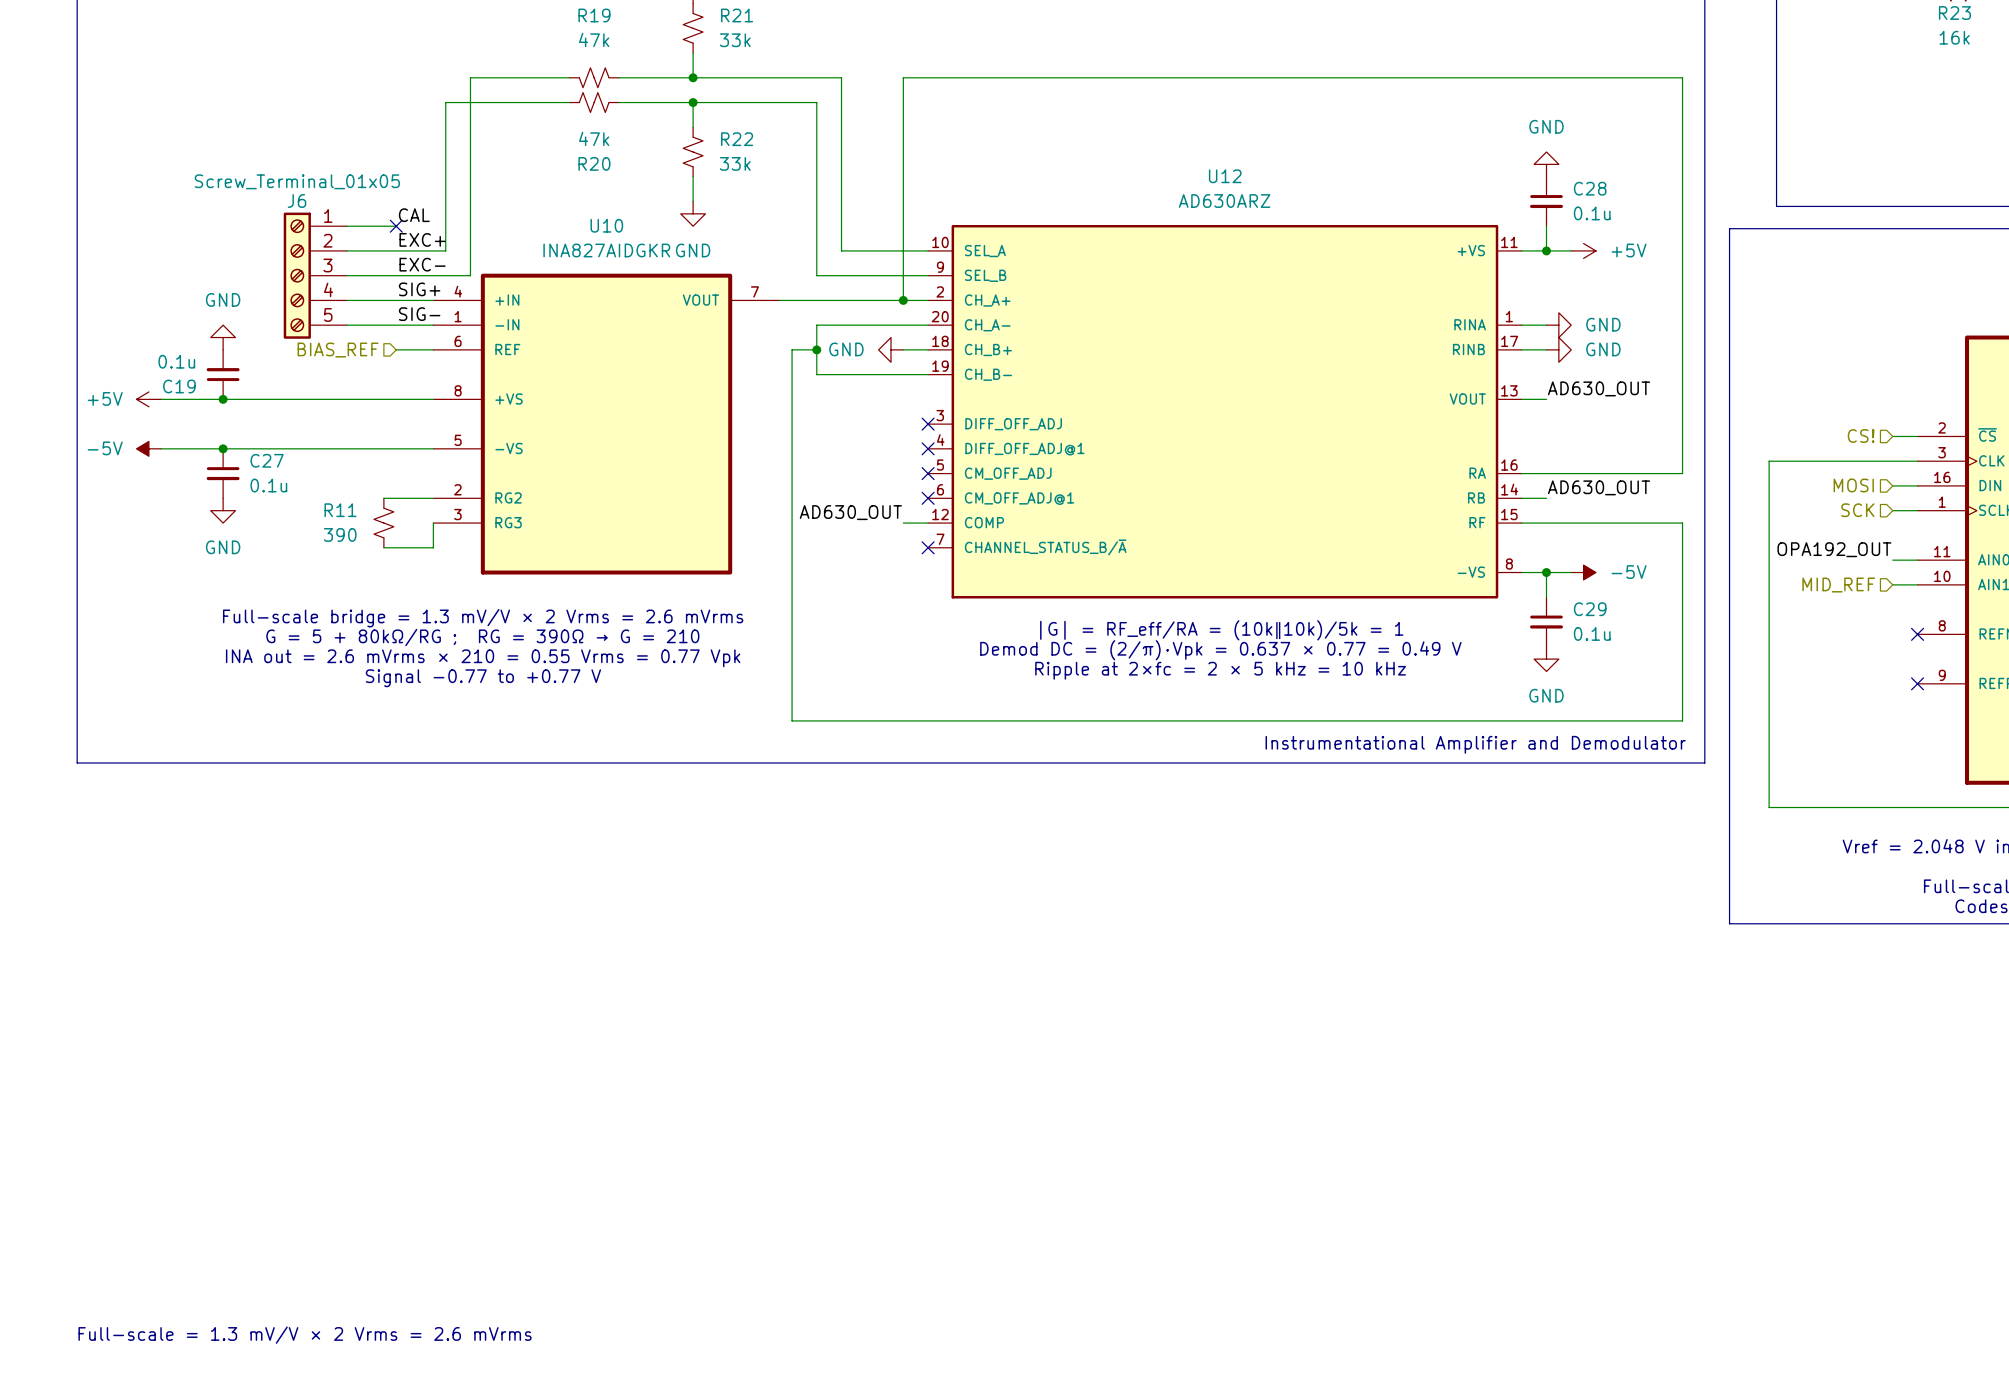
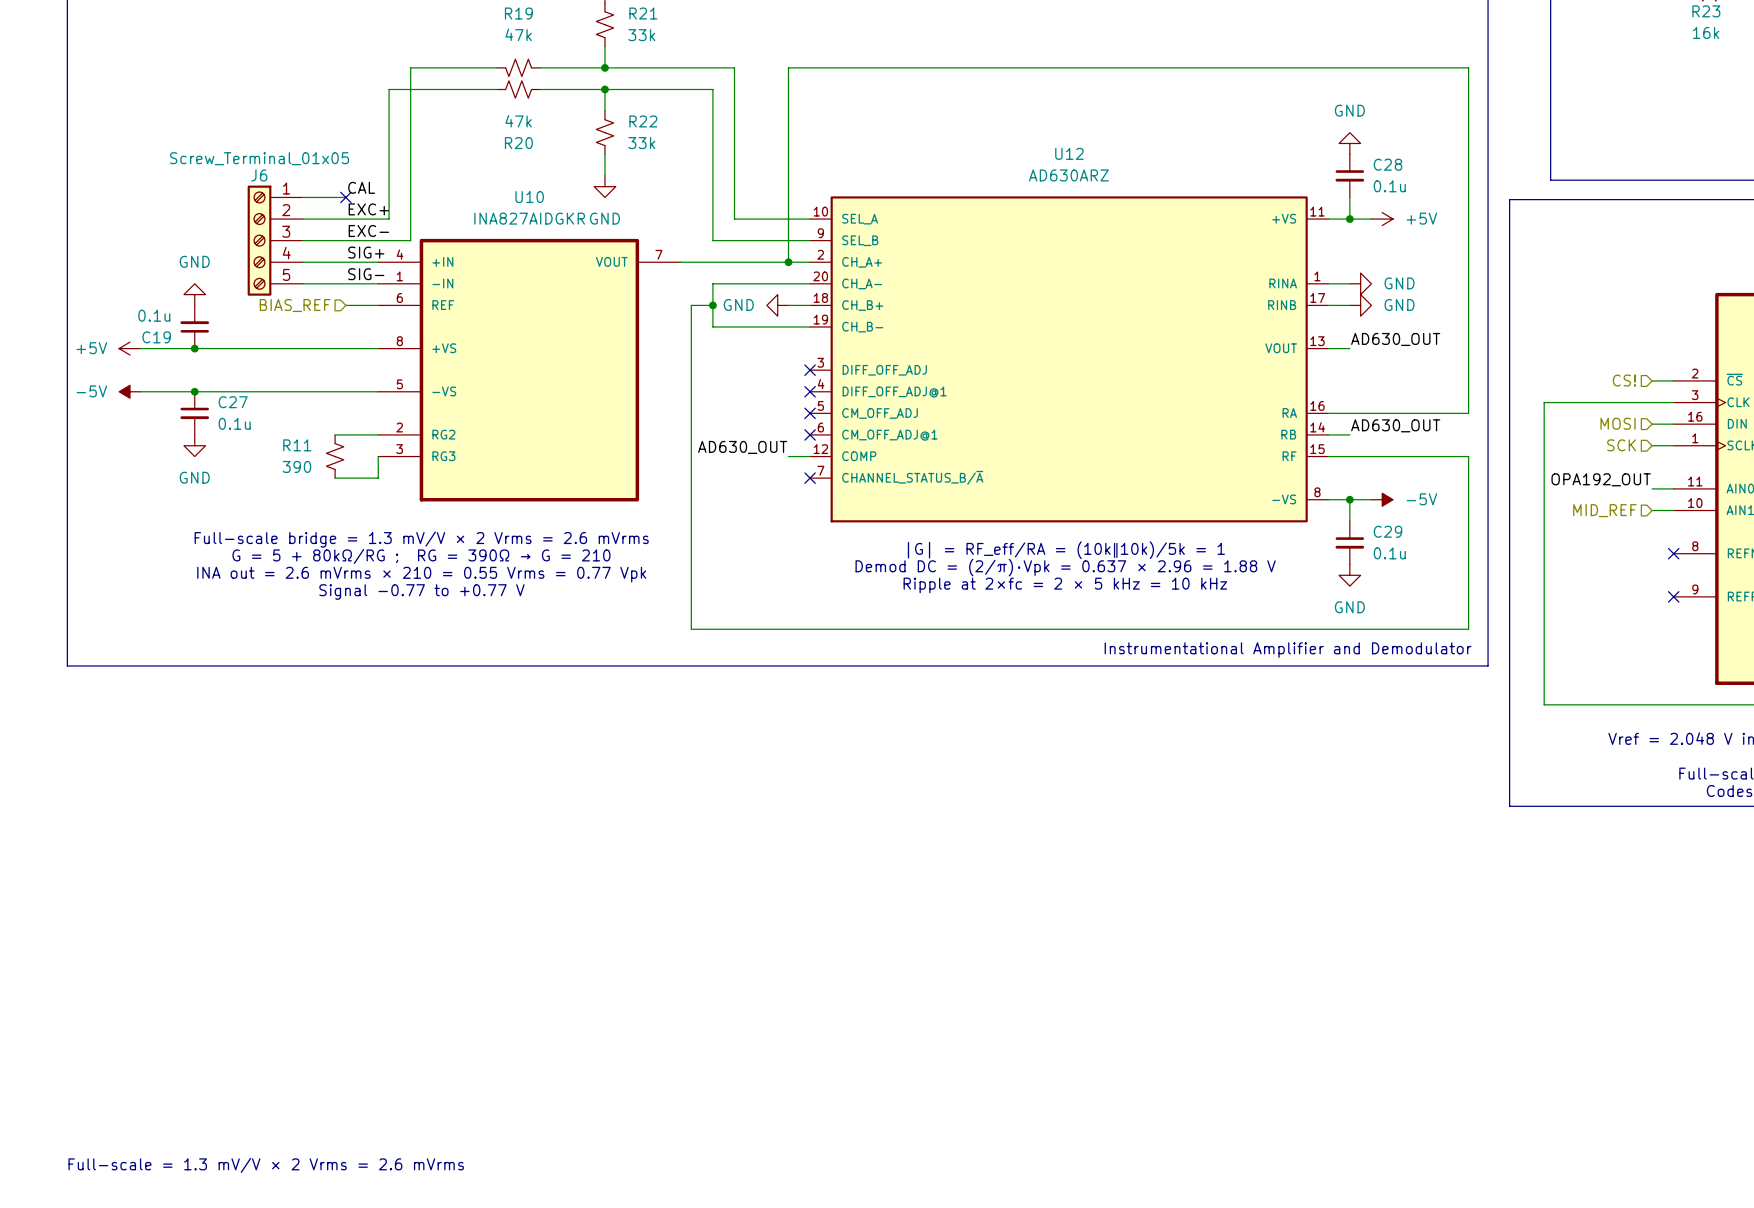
text: Demod DC = (2/π)·Vpk = 0.637 × 0.77 = 0.49 V (1220, 650) -> Demod DC = (2/π)·Vpk = 0.637 × 2.96 = 1.88 V (1065, 567)

